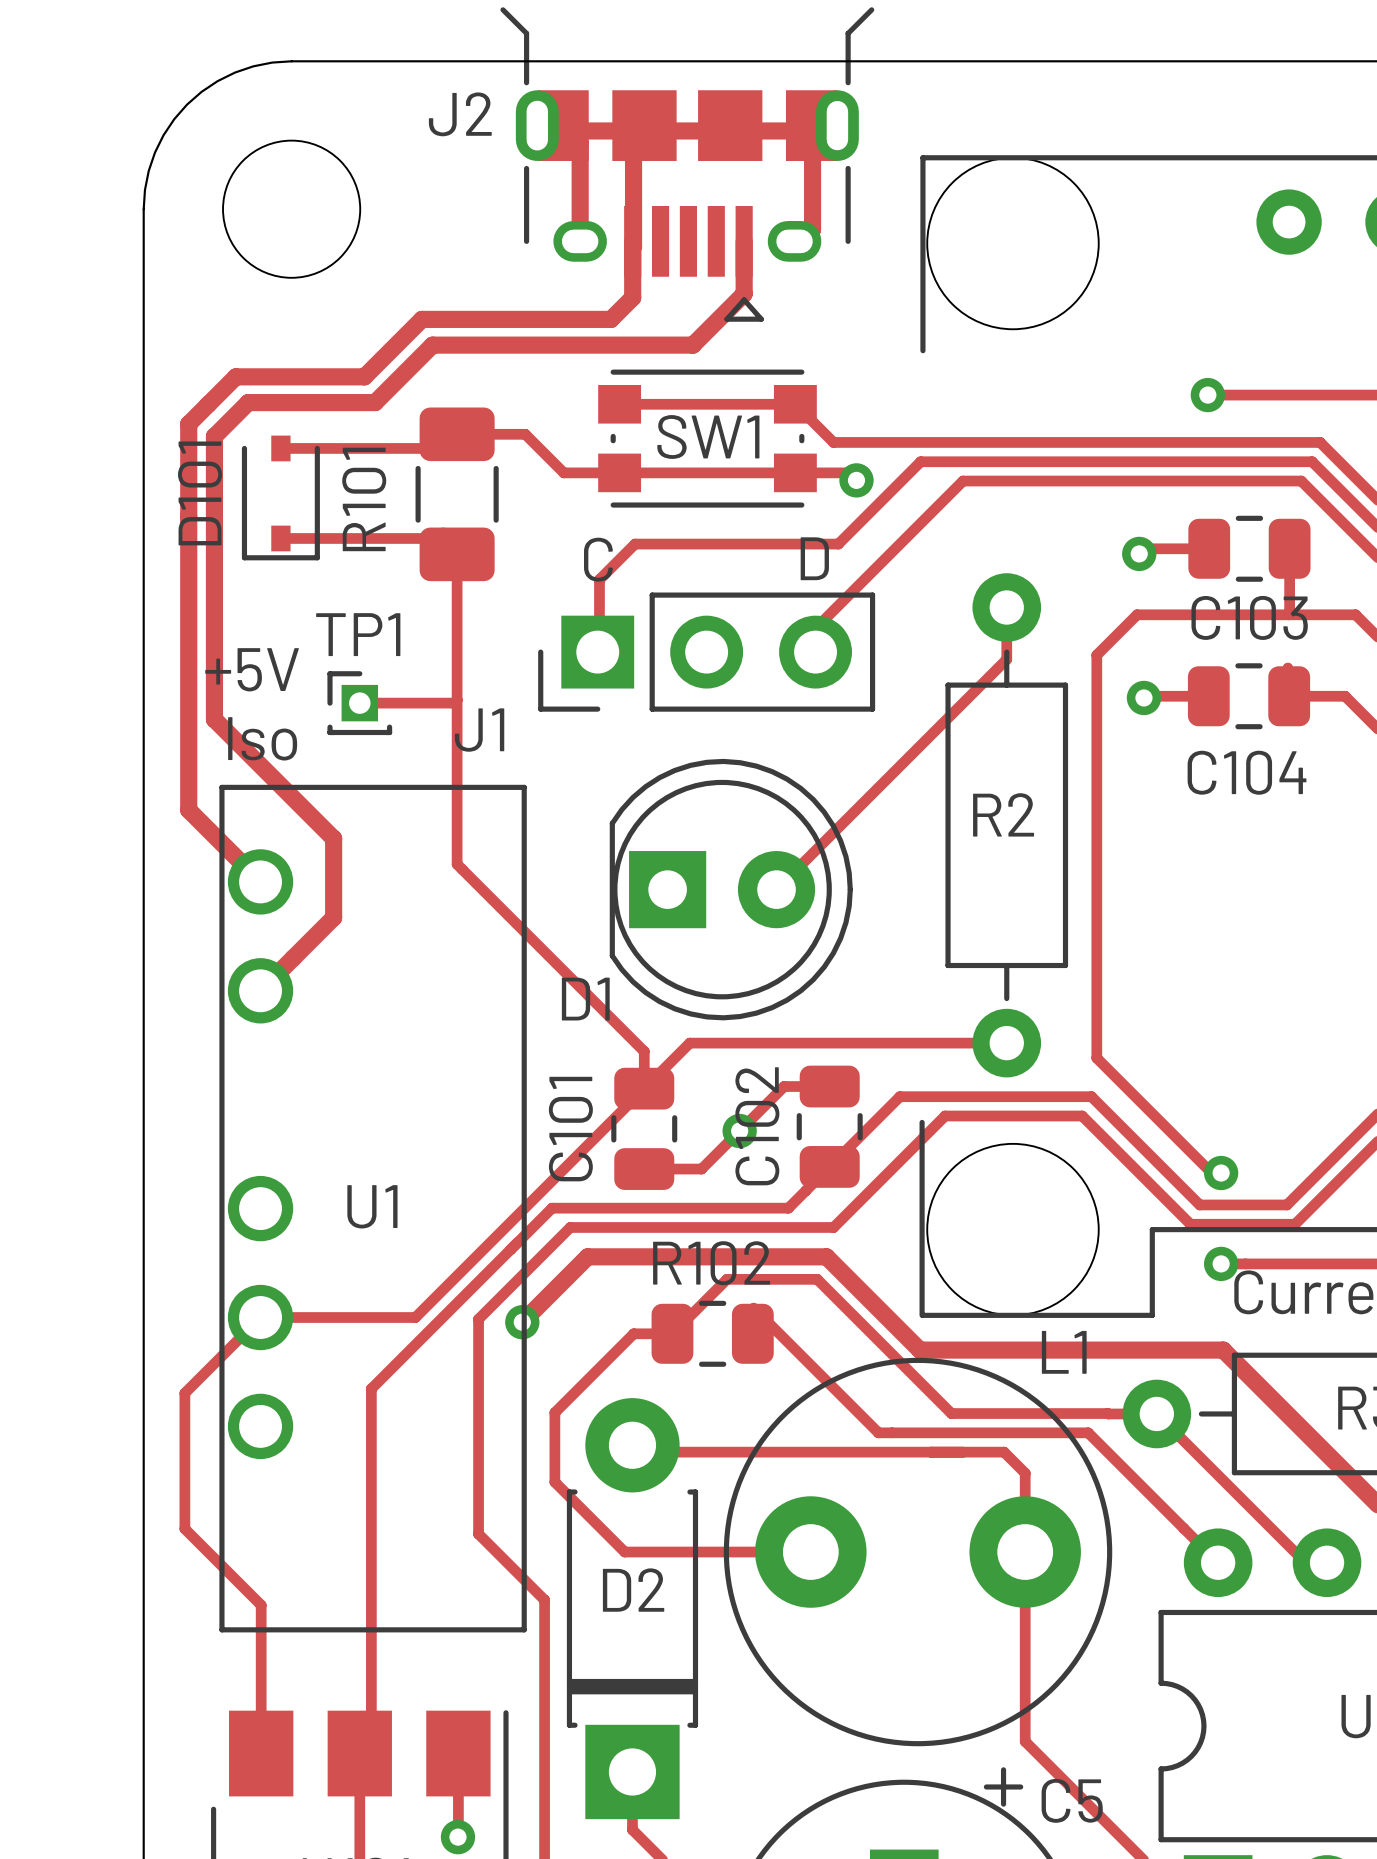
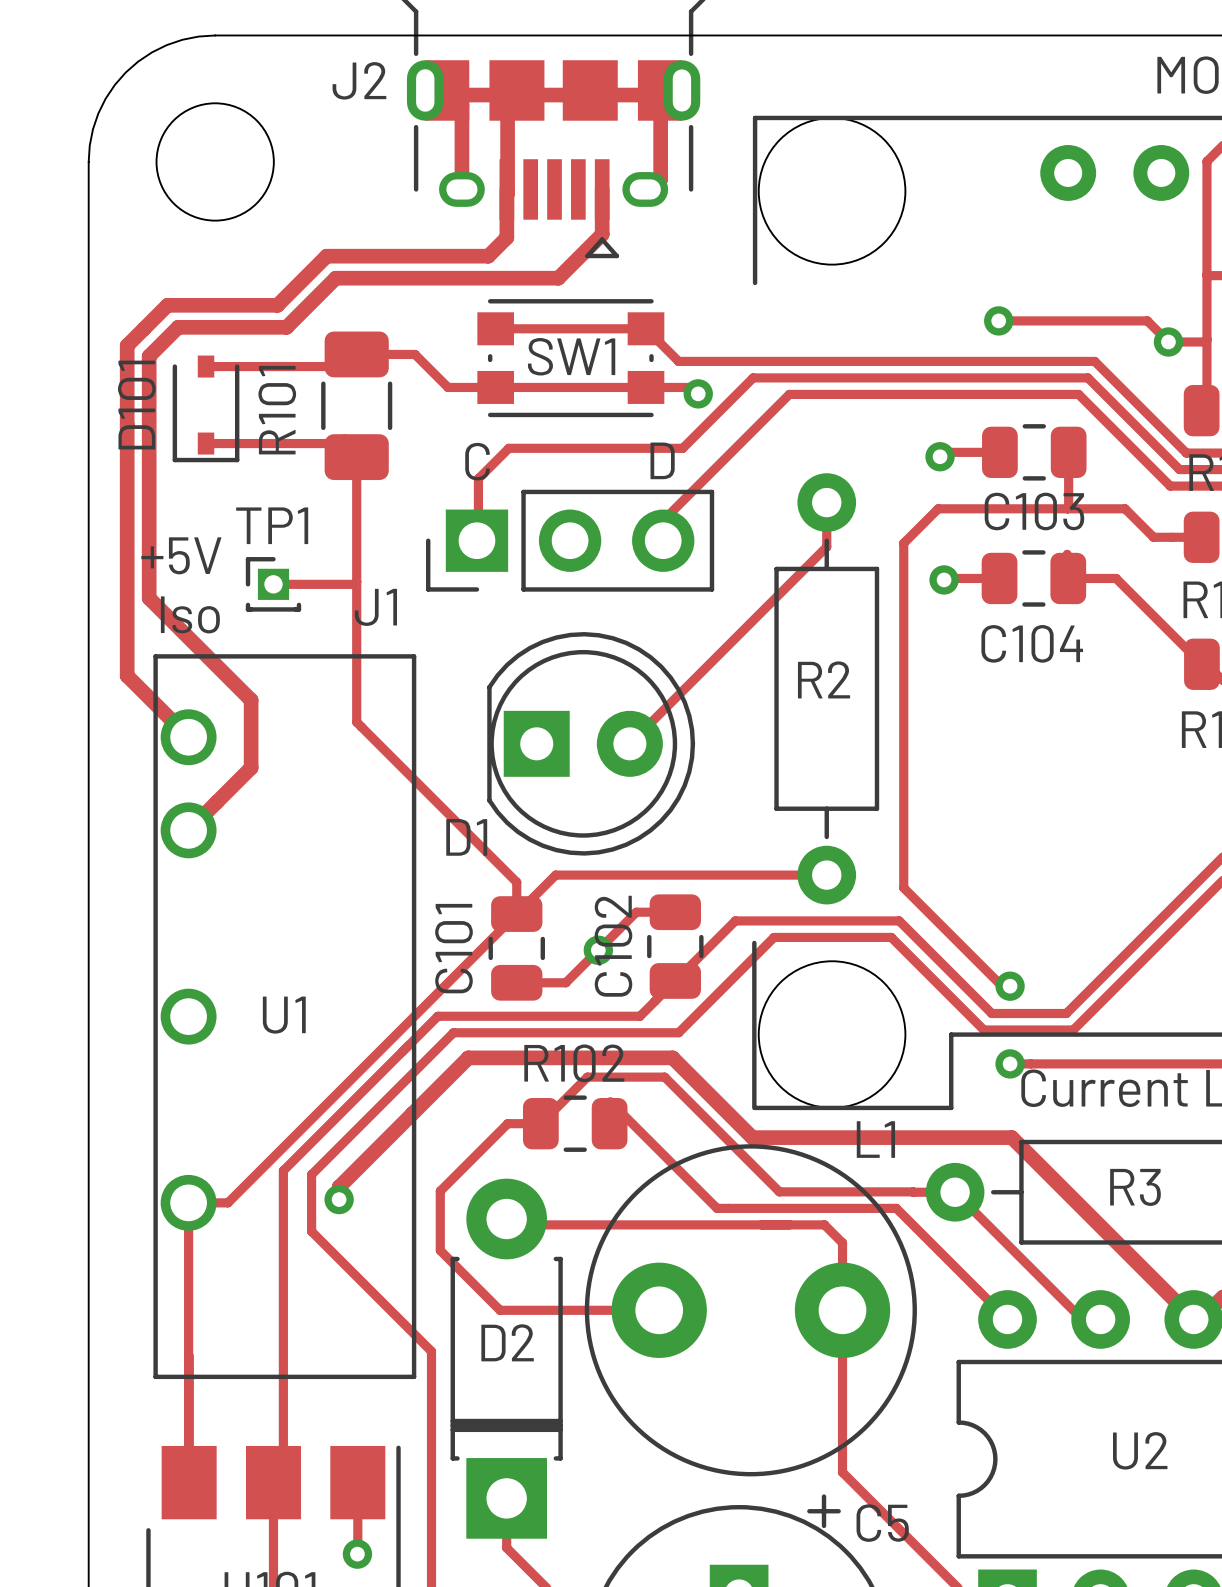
U1 footprint: [219, 784, 527, 1633] -> [153, 654, 417, 1380]
track: (415, 1317) (260, 1317) (184, 1393) (184, 1528) (261, 1605) -> (321, 1109) (227, 1202) (188, 1202) (189, 1482)
track: (478, 1319) (478, 1534) -> (375, 1111) (311, 1174) (311, 1231) (375, 1294)
track: none -> (412, 1113) (339, 1187) (339, 1199)
via position: (522, 1322) -> (339, 1199)

